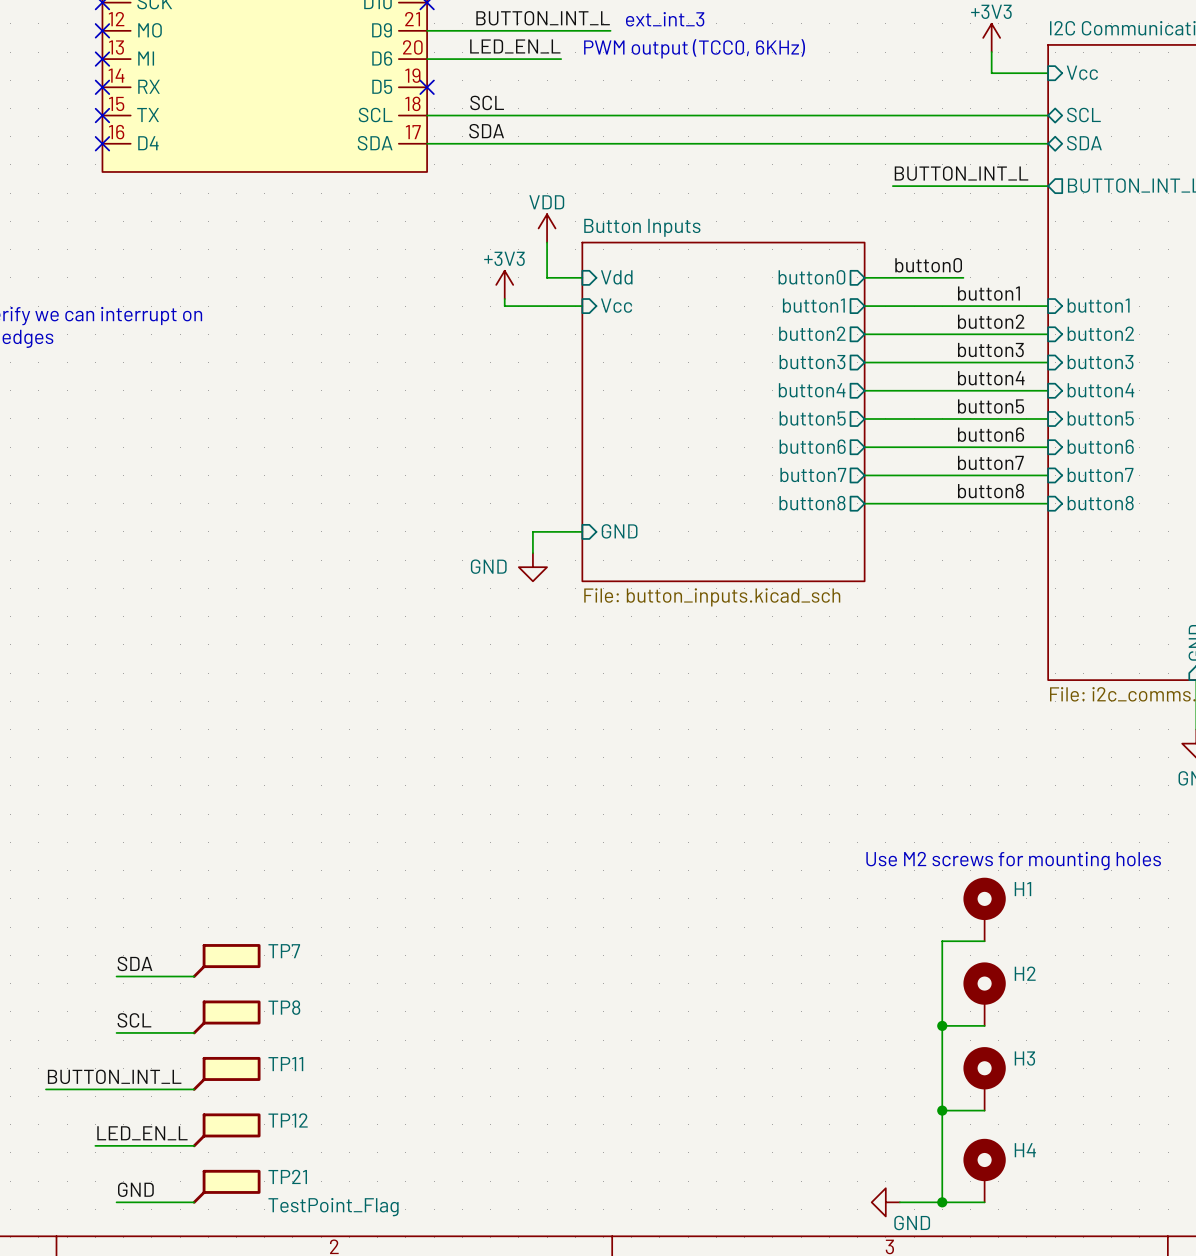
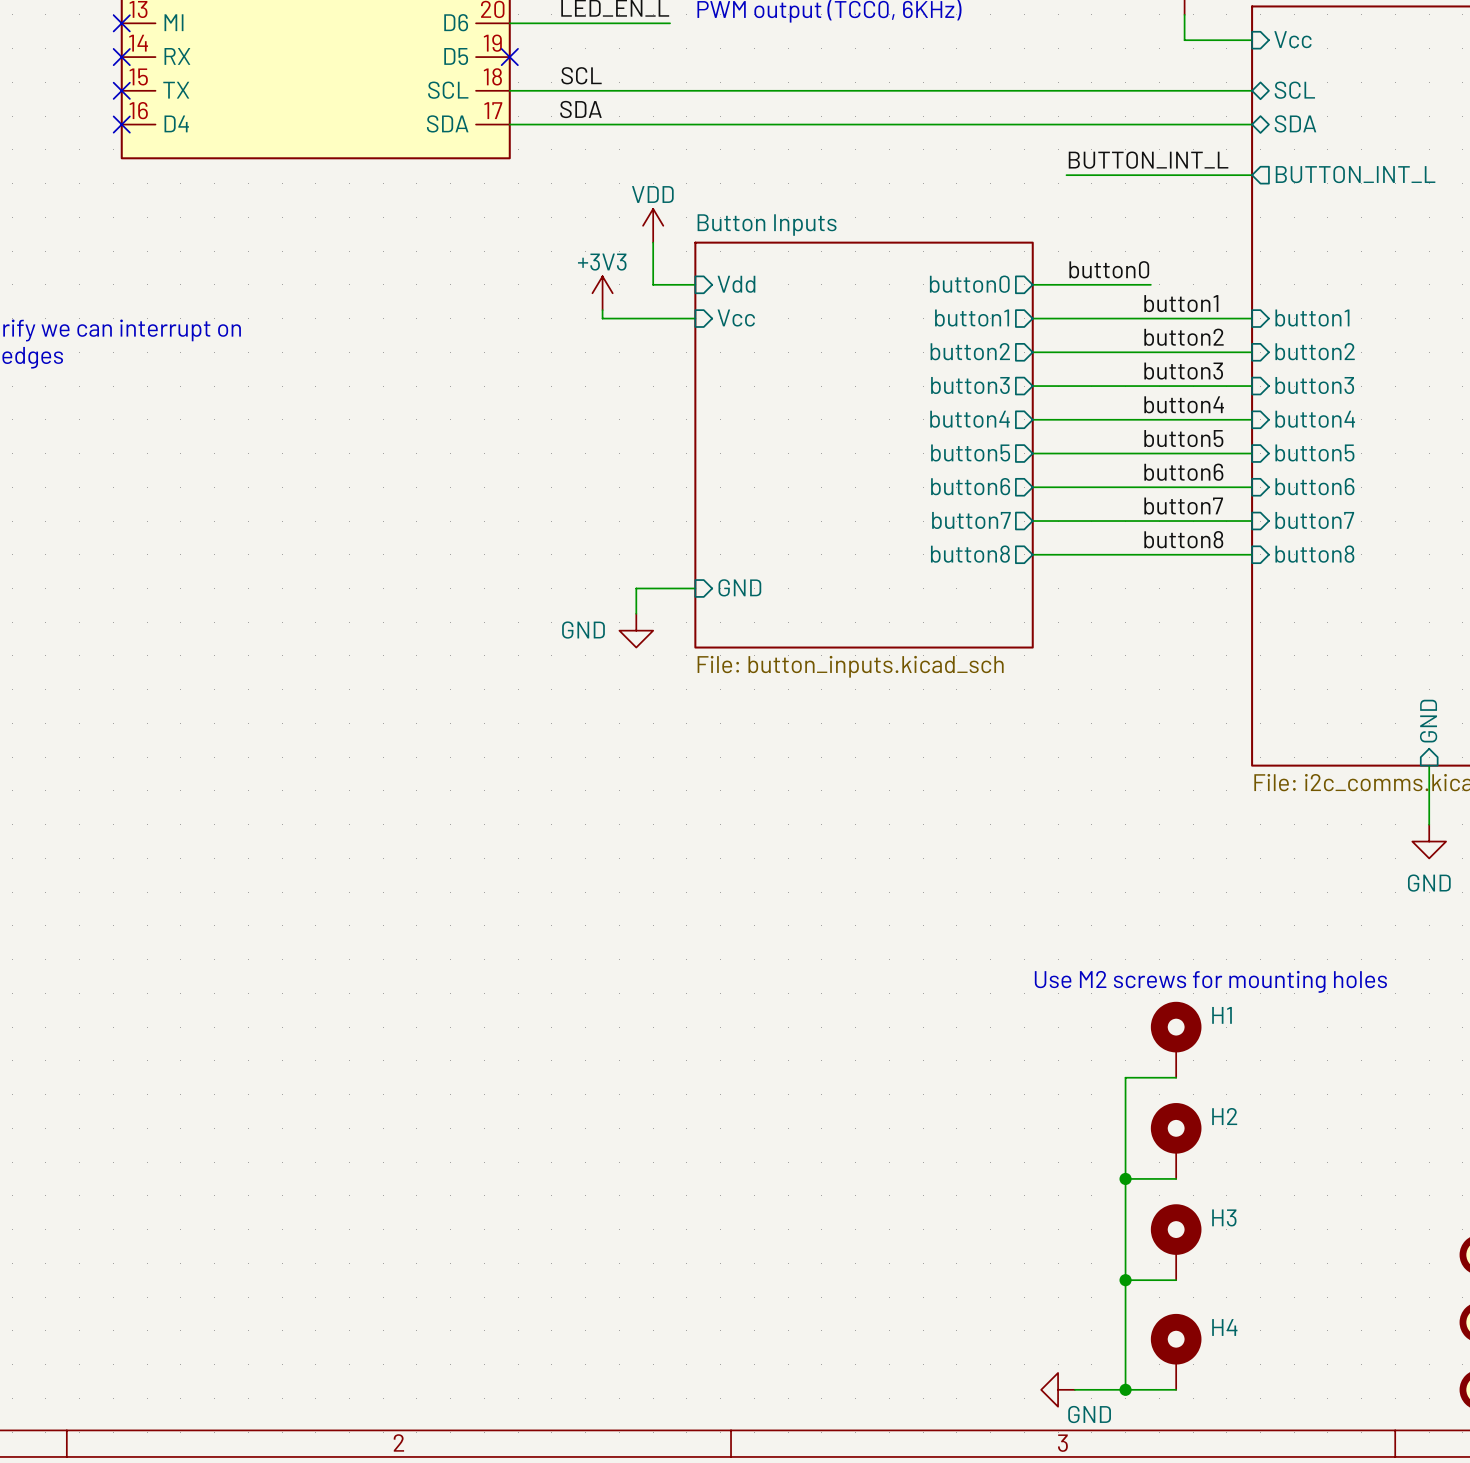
TP7: (226, 960) -> none
label: SDA (134, 963) -> none
wire: (116, 976) (194, 976) -> none
TP8: (226, 1017) -> none
label: SCL (134, 1020) -> none
wire: (116, 1032) (194, 1032) -> none
TP11: (226, 1073) -> none
label: BUTTON_INT_L (114, 1076) -> none
wire: (45, 1089) (194, 1089) -> none
TP12: (226, 1130) -> none
label: LED_EN_L (142, 1133) -> none
wire: (95, 1145) (194, 1145) -> none
TP21: TestPoint_Flag (226, 1186) -> none
label: GND (135, 1189) -> none
wire: (116, 1202) (194, 1202) -> none

